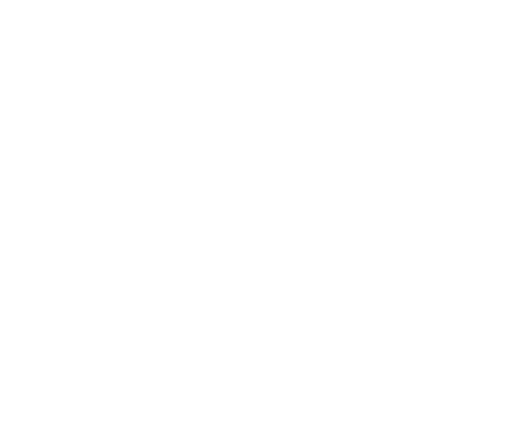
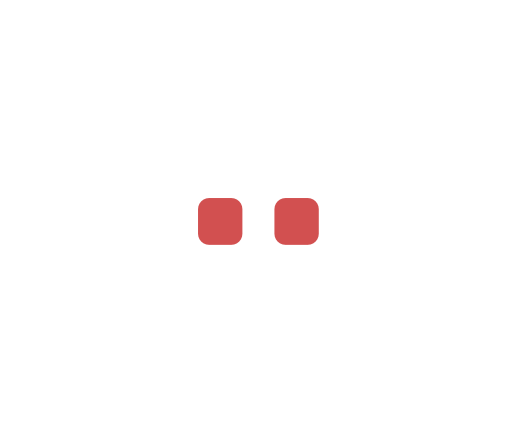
part: none -> (258, 221)

